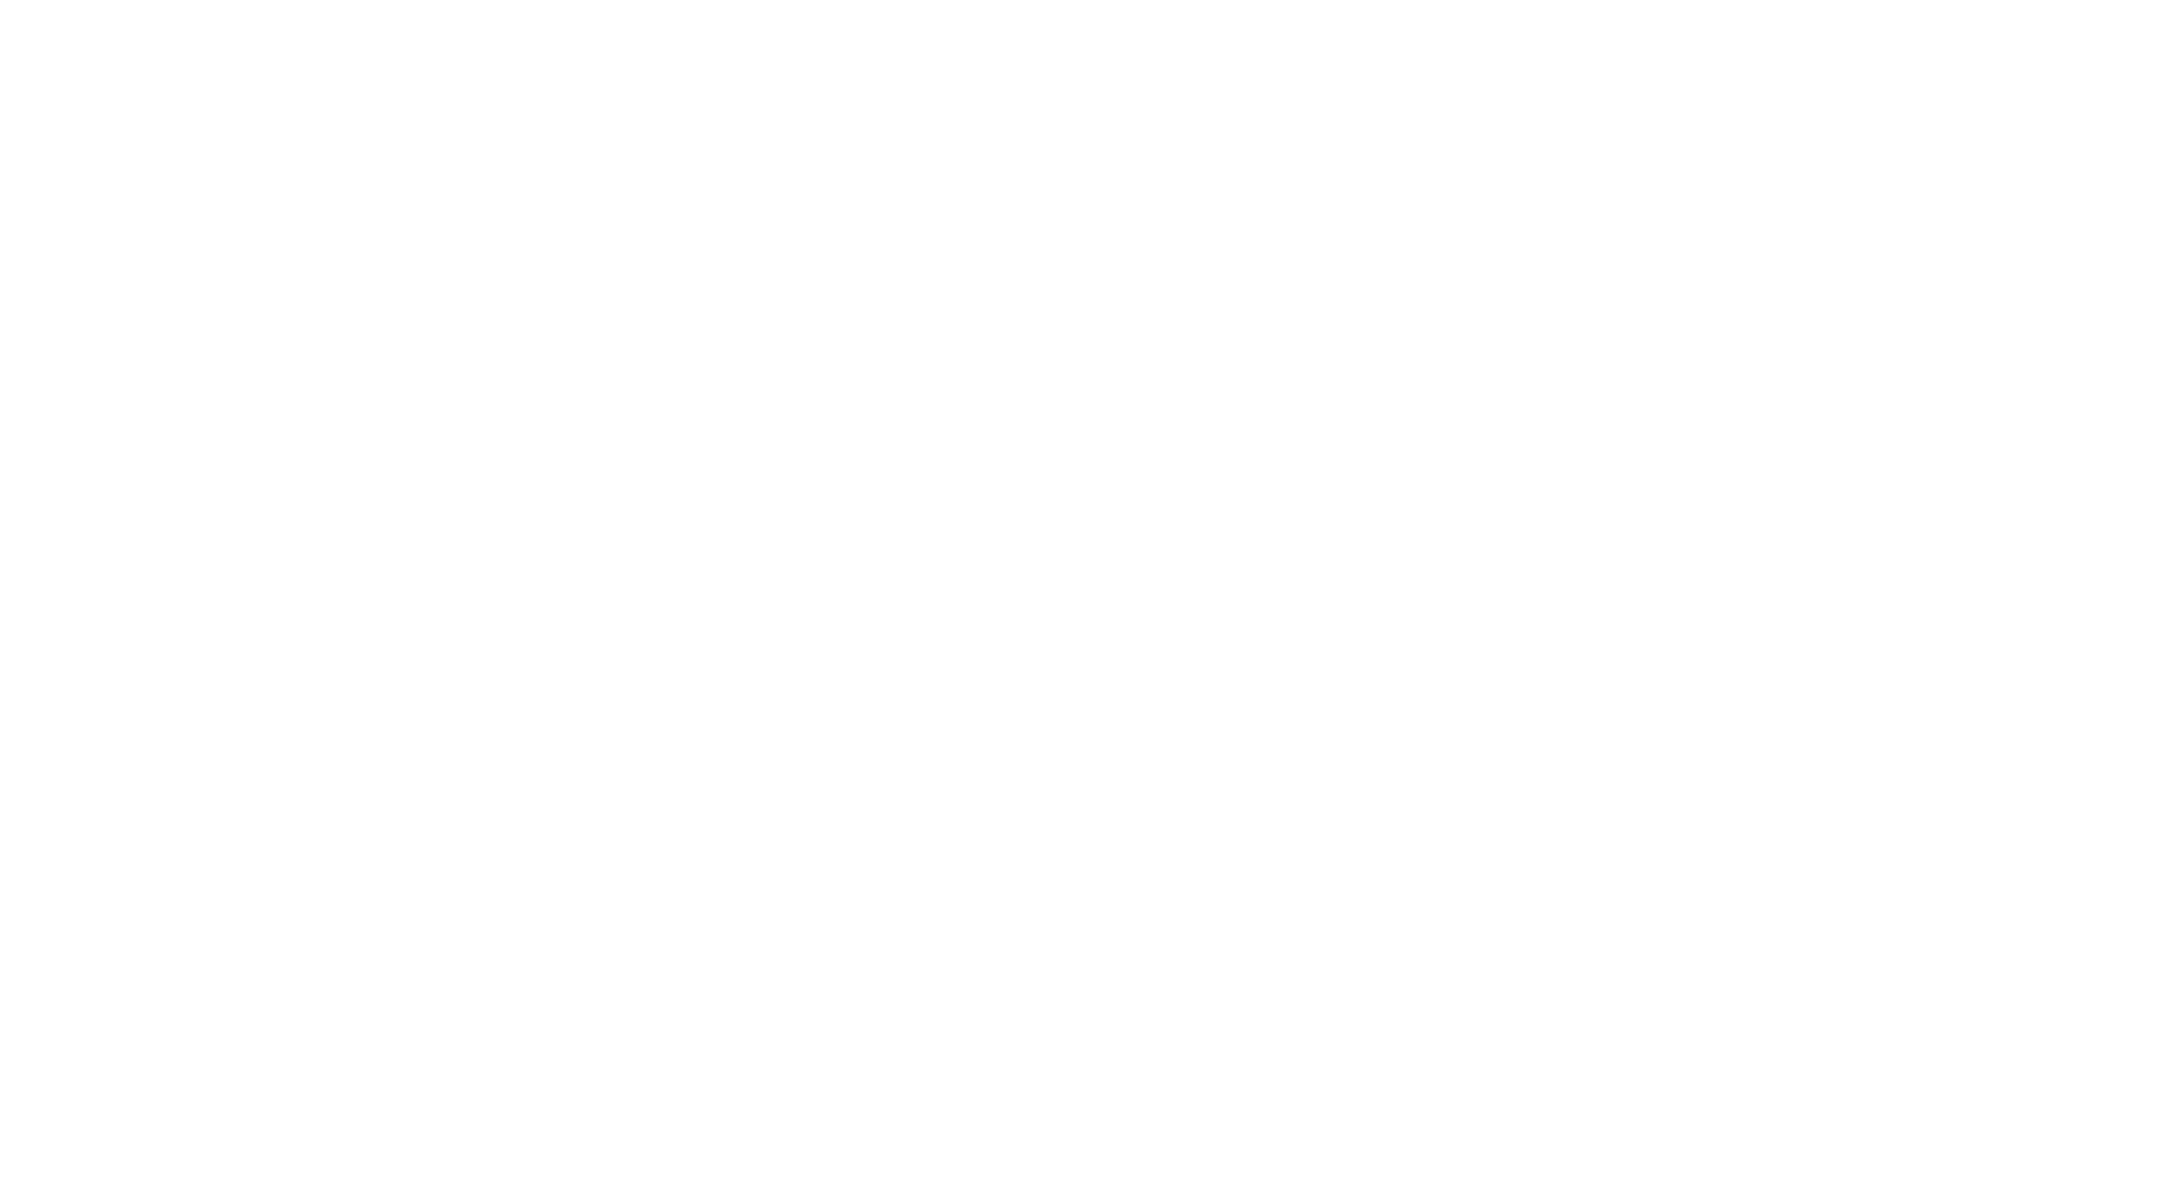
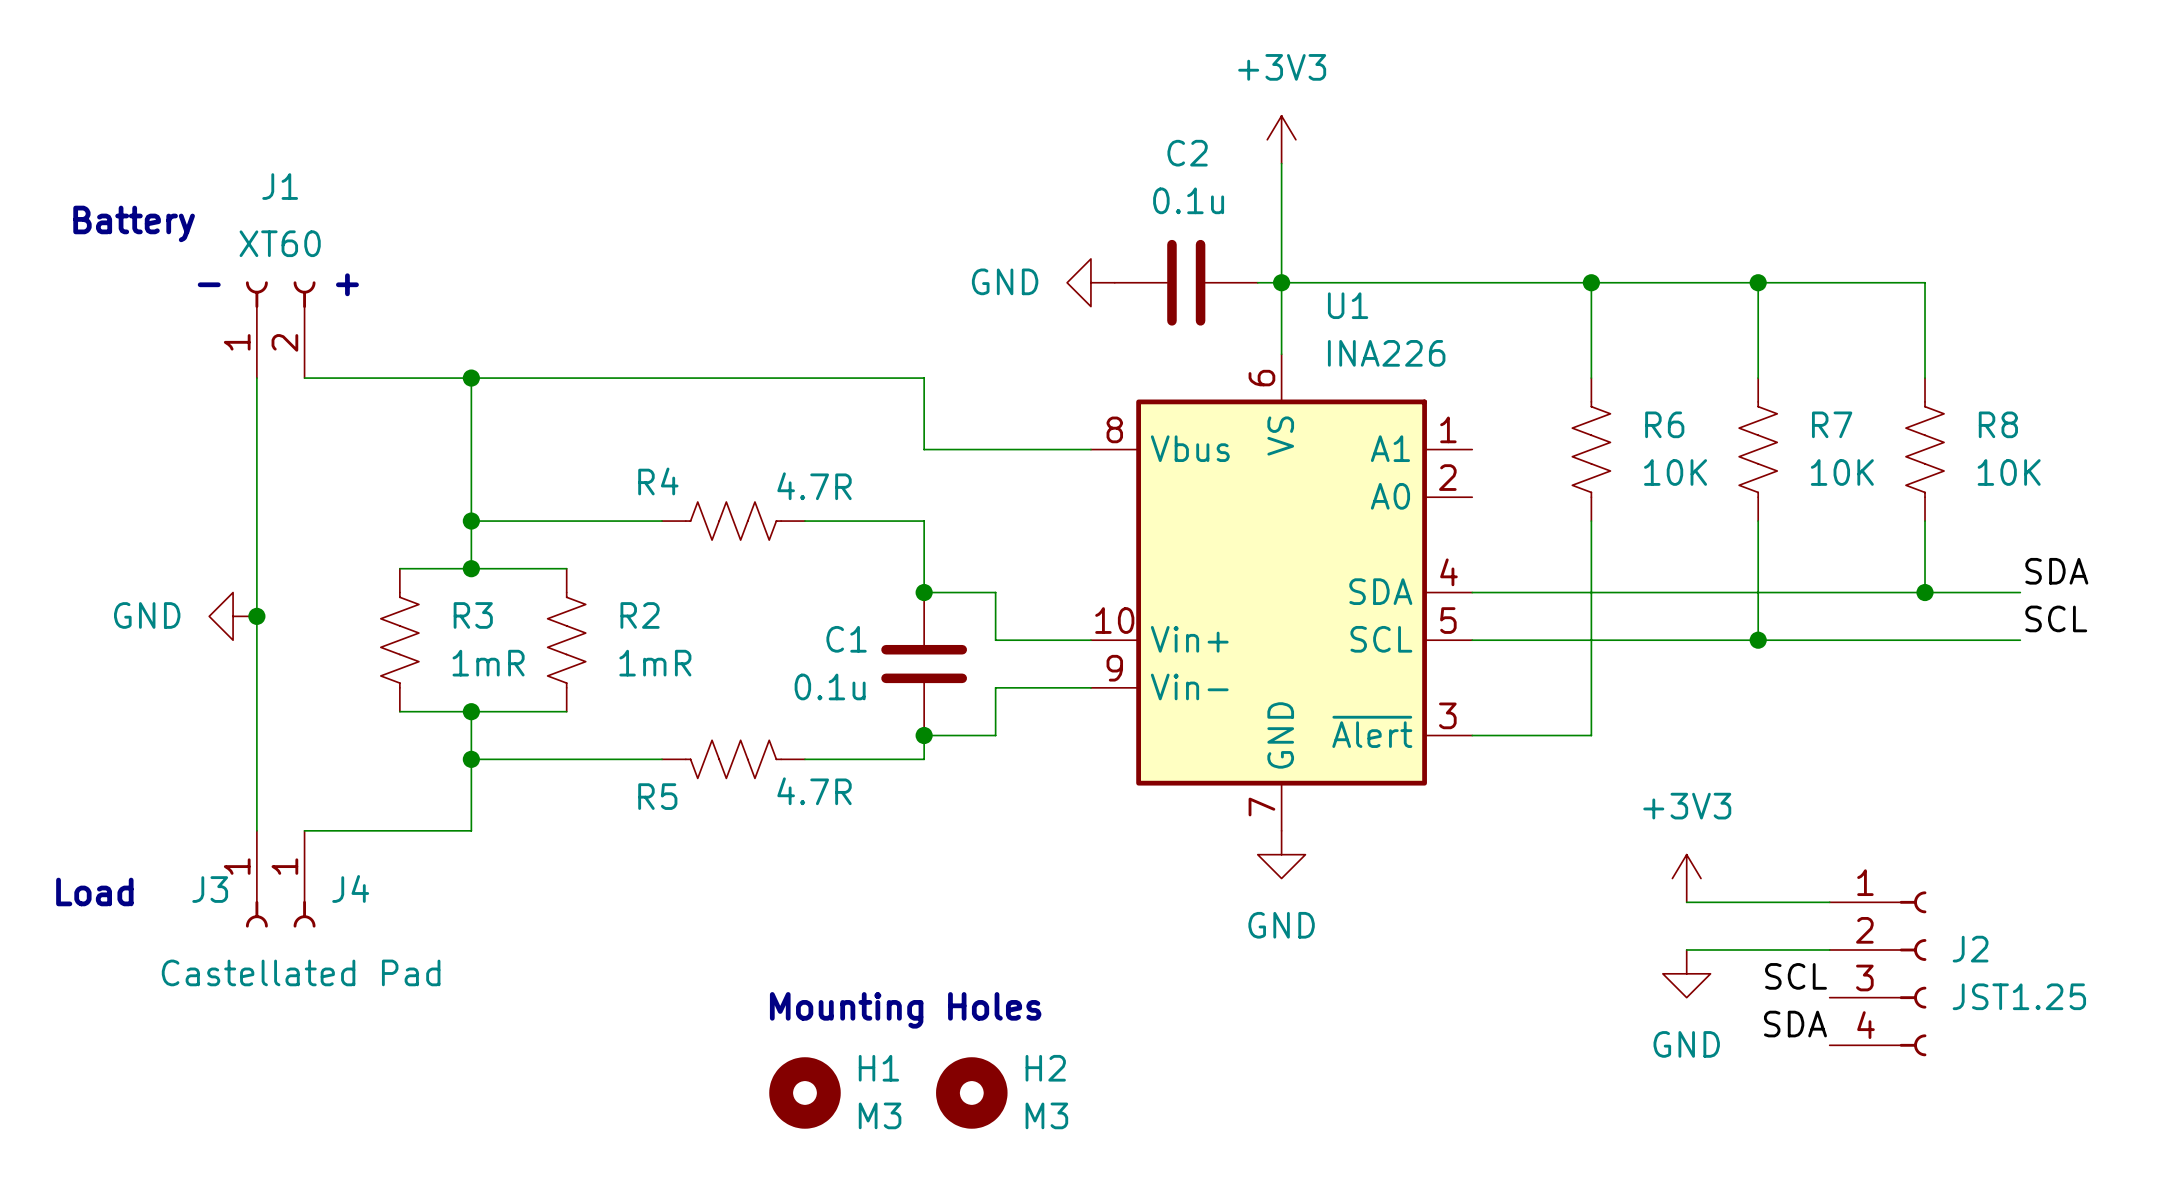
power symbol: none -> +3V3 (1281, 139)
wire: none -> (1281, 163) (1281, 354)
text: none -> Battery (134, 223)
text: none -> + (347, 284)
power symbol: none -> GND (1090, 282)
C2: none -> 0.1u (1186, 282)
wire: none -> (1257, 282) (1925, 282) (1925, 378)
junction: none -> (1281, 282)
wire: none -> (1591, 282) (1591, 378)
junction: none -> (1591, 282)
wire: none -> (1758, 282) (1758, 378)
junction: none -> (1758, 282)
text: none -> - (209, 284)
J1: none -> XT60 (280, 329)
wire: none -> (256, 378) (256, 830)
wire: none -> (304, 378) (924, 378) (924, 449) (1090, 449)
wire: none -> (471, 378) (471, 568)
junction: none -> (471, 378)
R6: none -> 10K (1591, 449)
R7: none -> 10K (1758, 449)
R8: none -> 10K (1925, 449)
wire: none -> (471, 521) (662, 521)
junction: none -> (471, 521)
R4: none -> 4.7R (733, 521)
wire: none -> (804, 521) (924, 521) (924, 592) (995, 592) (995, 640) (1090, 640)
wire: none -> (1591, 521) (1591, 735) (1472, 735)
wire: none -> (1758, 521) (1758, 640)
wire: none -> (1925, 521) (1925, 592)
wire: none -> (399, 568) (566, 568)
junction: none -> (471, 568)
label: none -> SDA (2056, 571)
junction: none -> (924, 592)
U1: none -> INA226 (1281, 592)
wire: none -> (1472, 592) (2020, 592)
junction: none -> (1925, 592)
power symbol: none -> GND (233, 616)
junction: none -> (256, 616)
label: none -> SCL (2056, 618)
R3: none -> 1mR (399, 640)
R2: none -> 1mR (566, 640)
wire: none -> (1472, 640) (2020, 640)
junction: none -> (1758, 640)
C1: none -> 0.1u (924, 664)
wire: none -> (1090, 687) (995, 687) (995, 735) (924, 735) (924, 759) (804, 759)
wire: none -> (399, 711) (566, 711)
wire: none -> (471, 711) (471, 830) (304, 830)
junction: none -> (471, 711)
junction: none -> (924, 735)
wire: none -> (471, 759) (662, 759)
junction: none -> (471, 759)
R5: none -> 4.7R (733, 759)
power symbol: none -> GND (1281, 854)
power symbol: none -> +3V3 (1686, 878)
J3: none -> (256, 879)
J4: none -> Castellated Pad (304, 879)
text: none -> Load (94, 891)
wire: none -> (1686, 902) (1829, 902)
wire: none -> (1686, 949) (1829, 949)
power symbol: none -> GND (1686, 973)
J2: none -> JST1.25 (1878, 973)
label: none -> SCL (1796, 976)
text: none -> Mounting Holes (905, 1010)
label: none -> SDA (1795, 1024)
H1: none -> M3 (804, 1092)
H2: none -> M3 (971, 1092)

